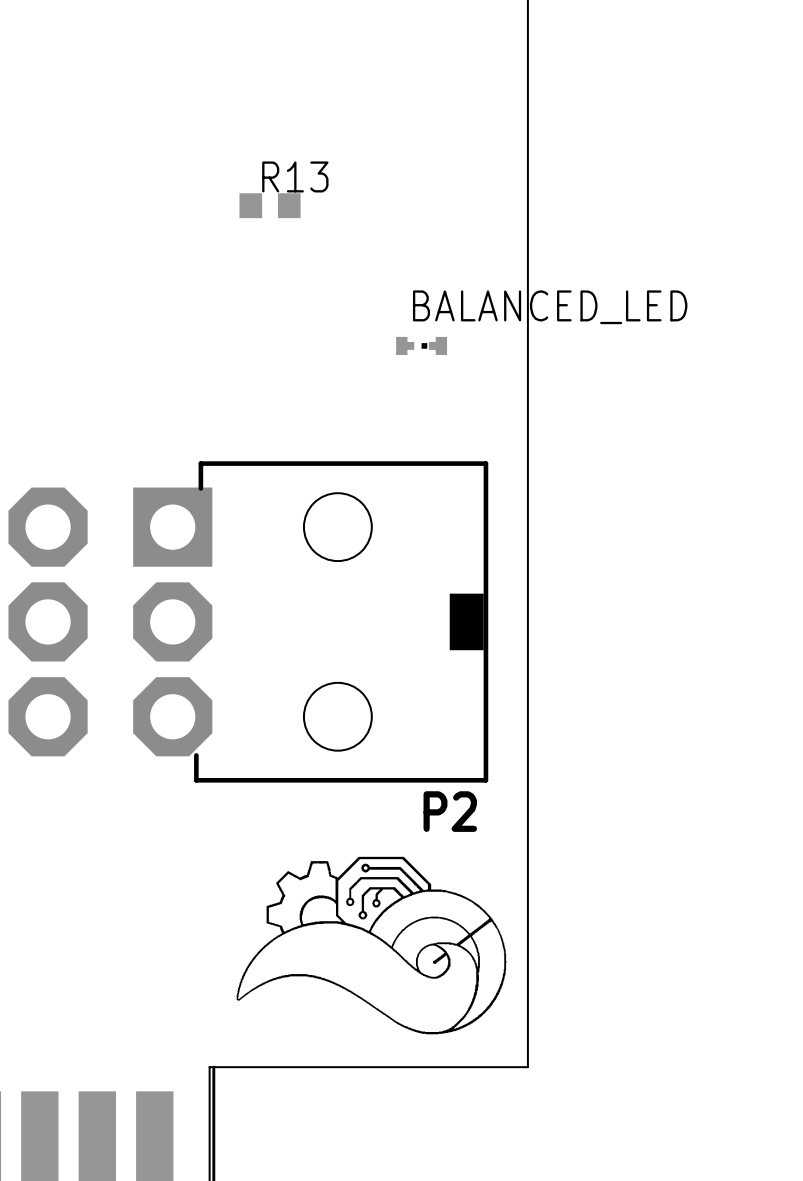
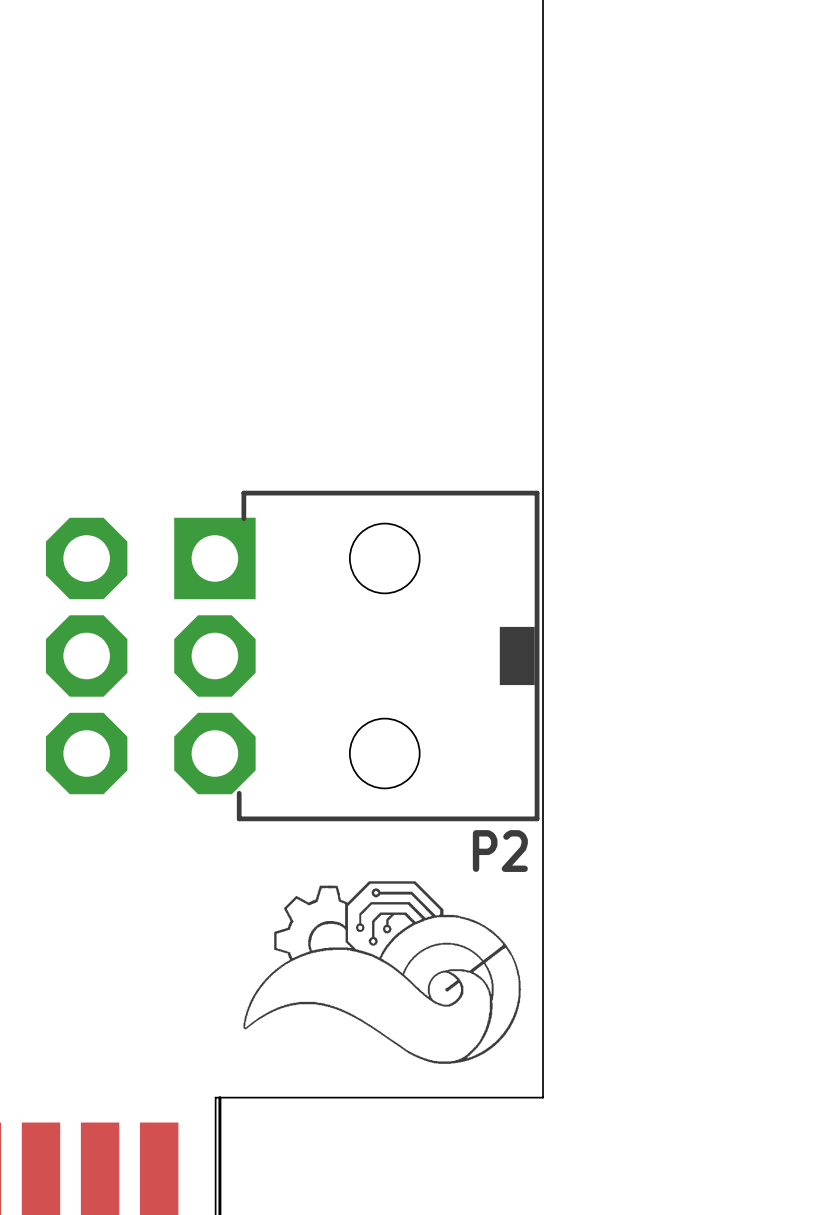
R13: (270, 205) -> none
BALANCED_LED: (421, 345) -> none
P2 position: (248, 621) -> (292, 655)

